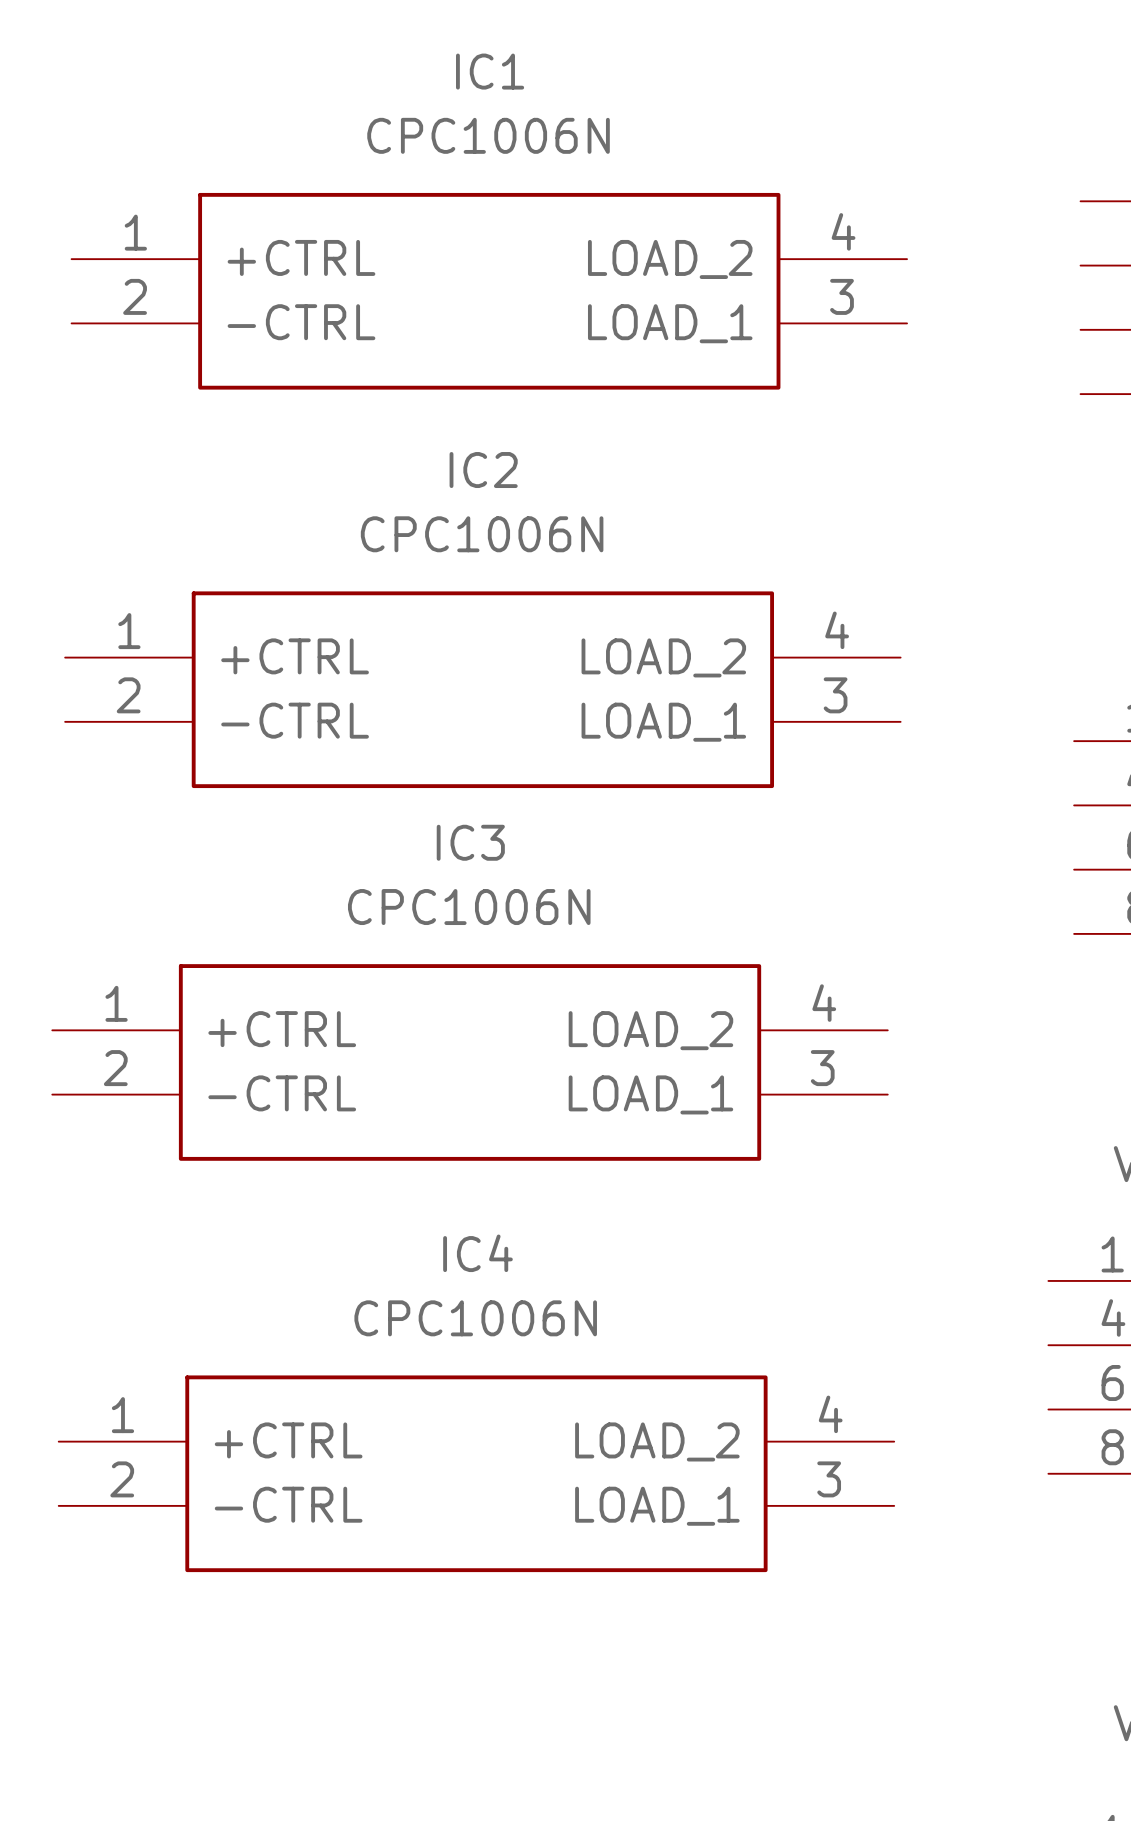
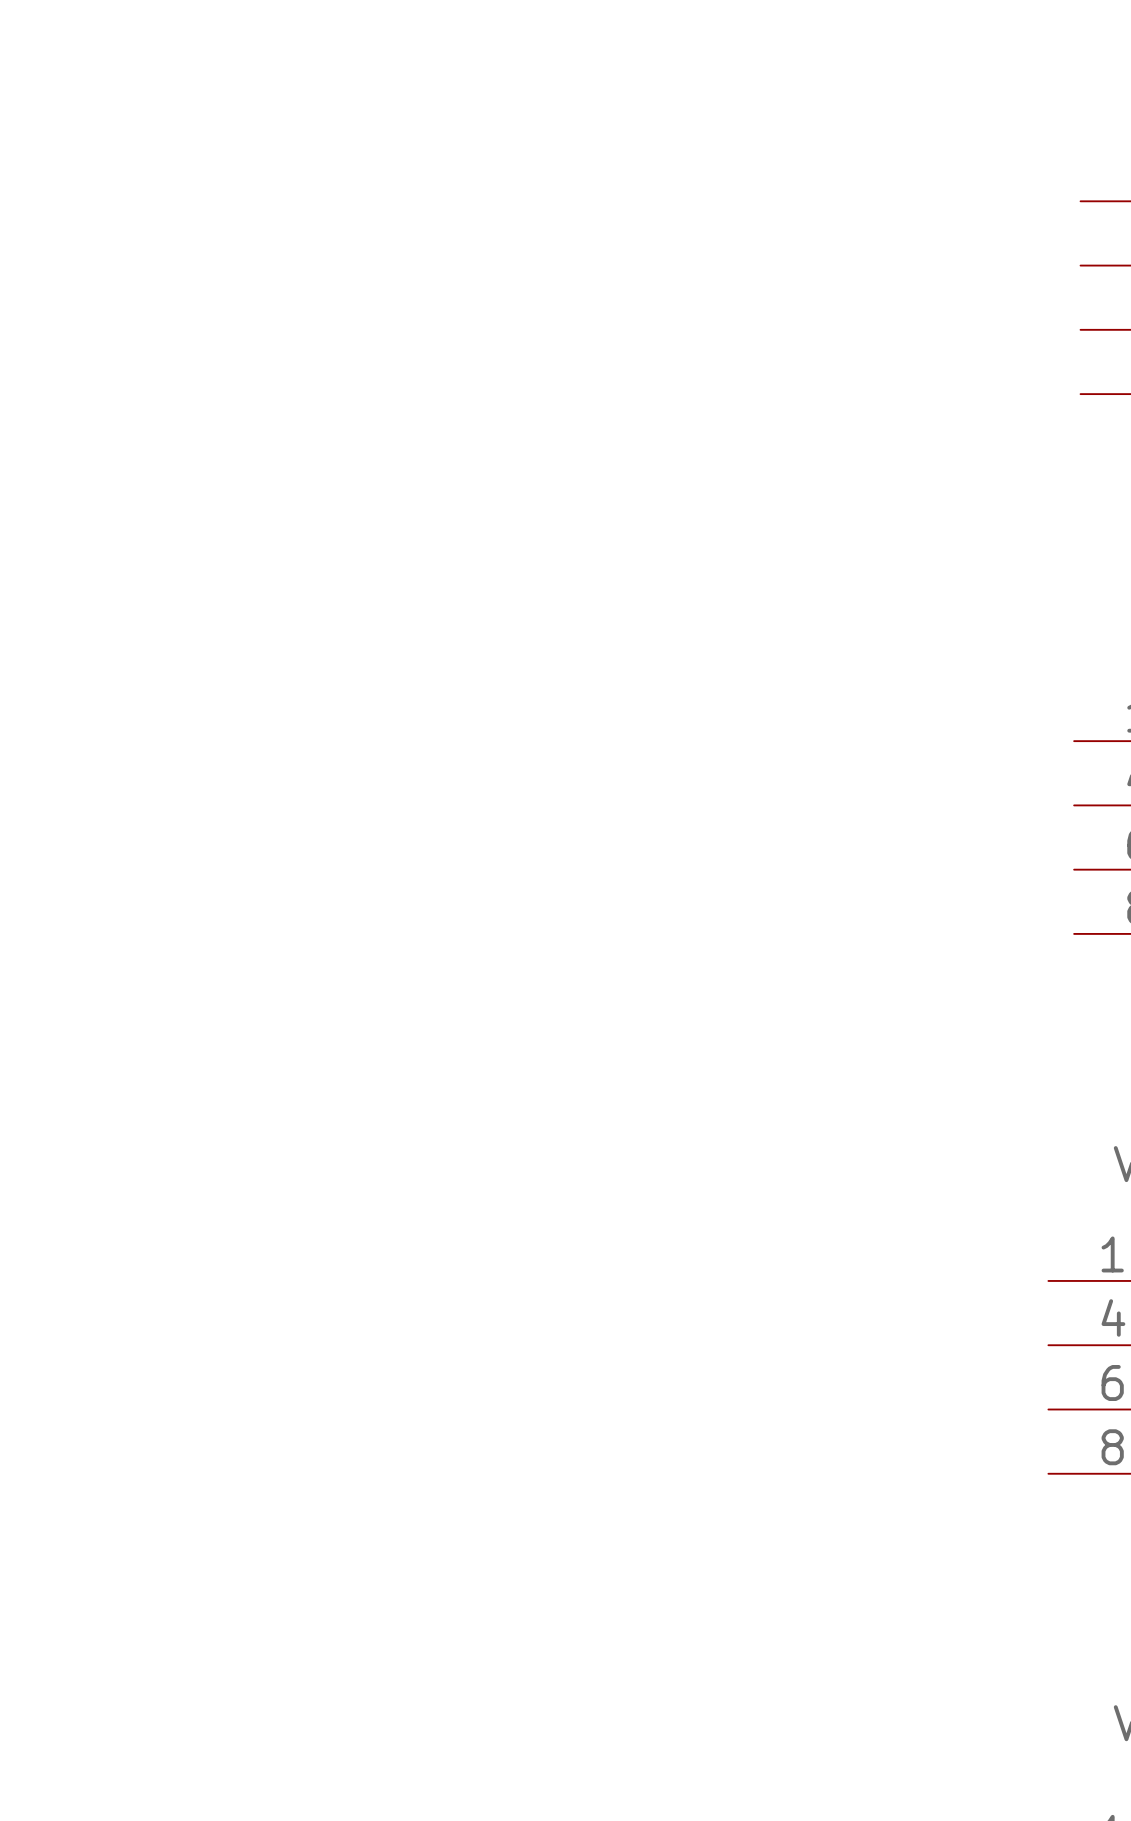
IC1: CPC1006N (489, 291) -> none
IC2: CPC1006N (482, 689) -> none
IC3: CPC1006N (470, 1062) -> none
IC4: CPC1006N (476, 1473) -> none

